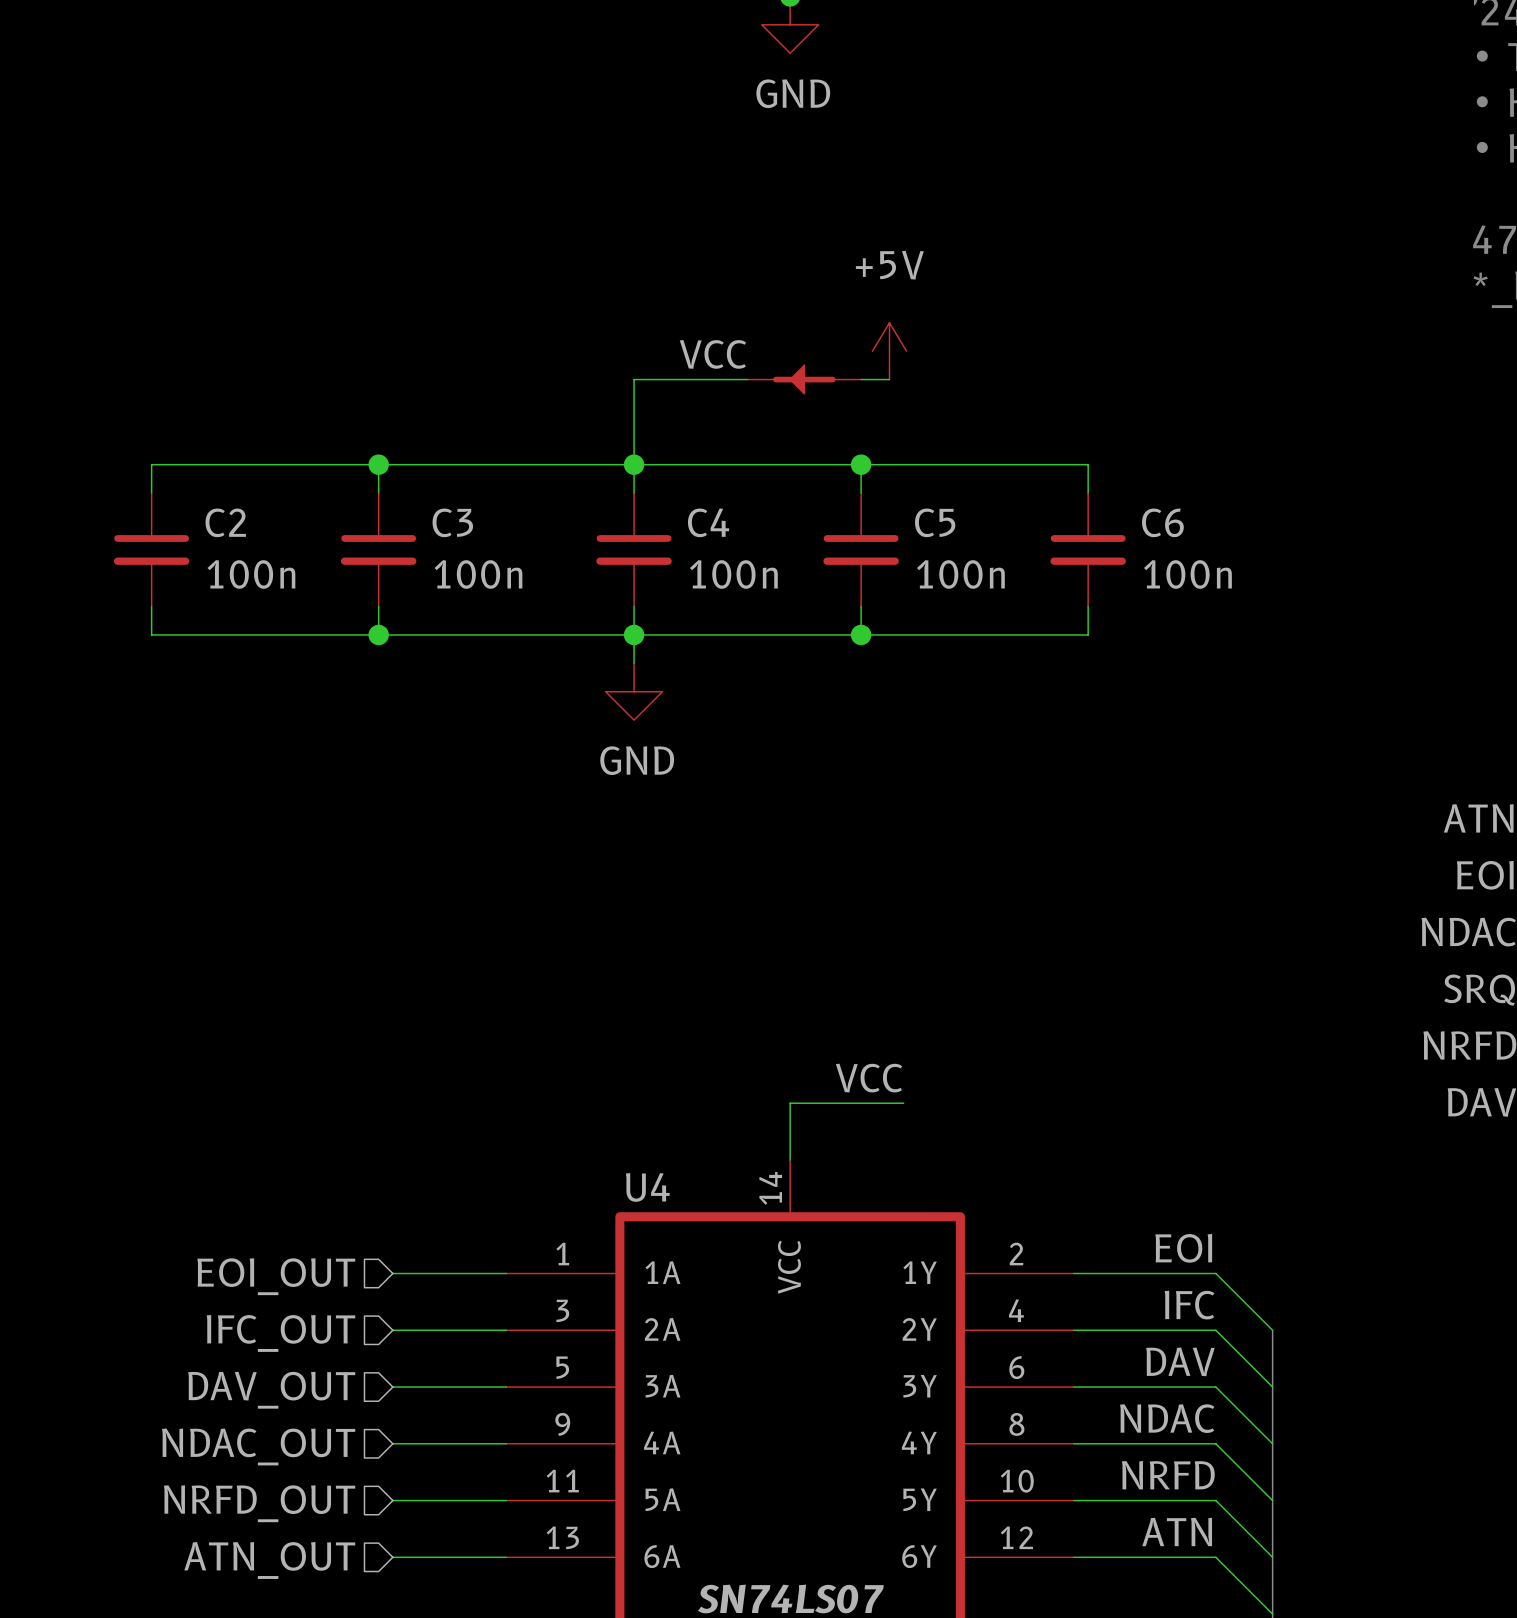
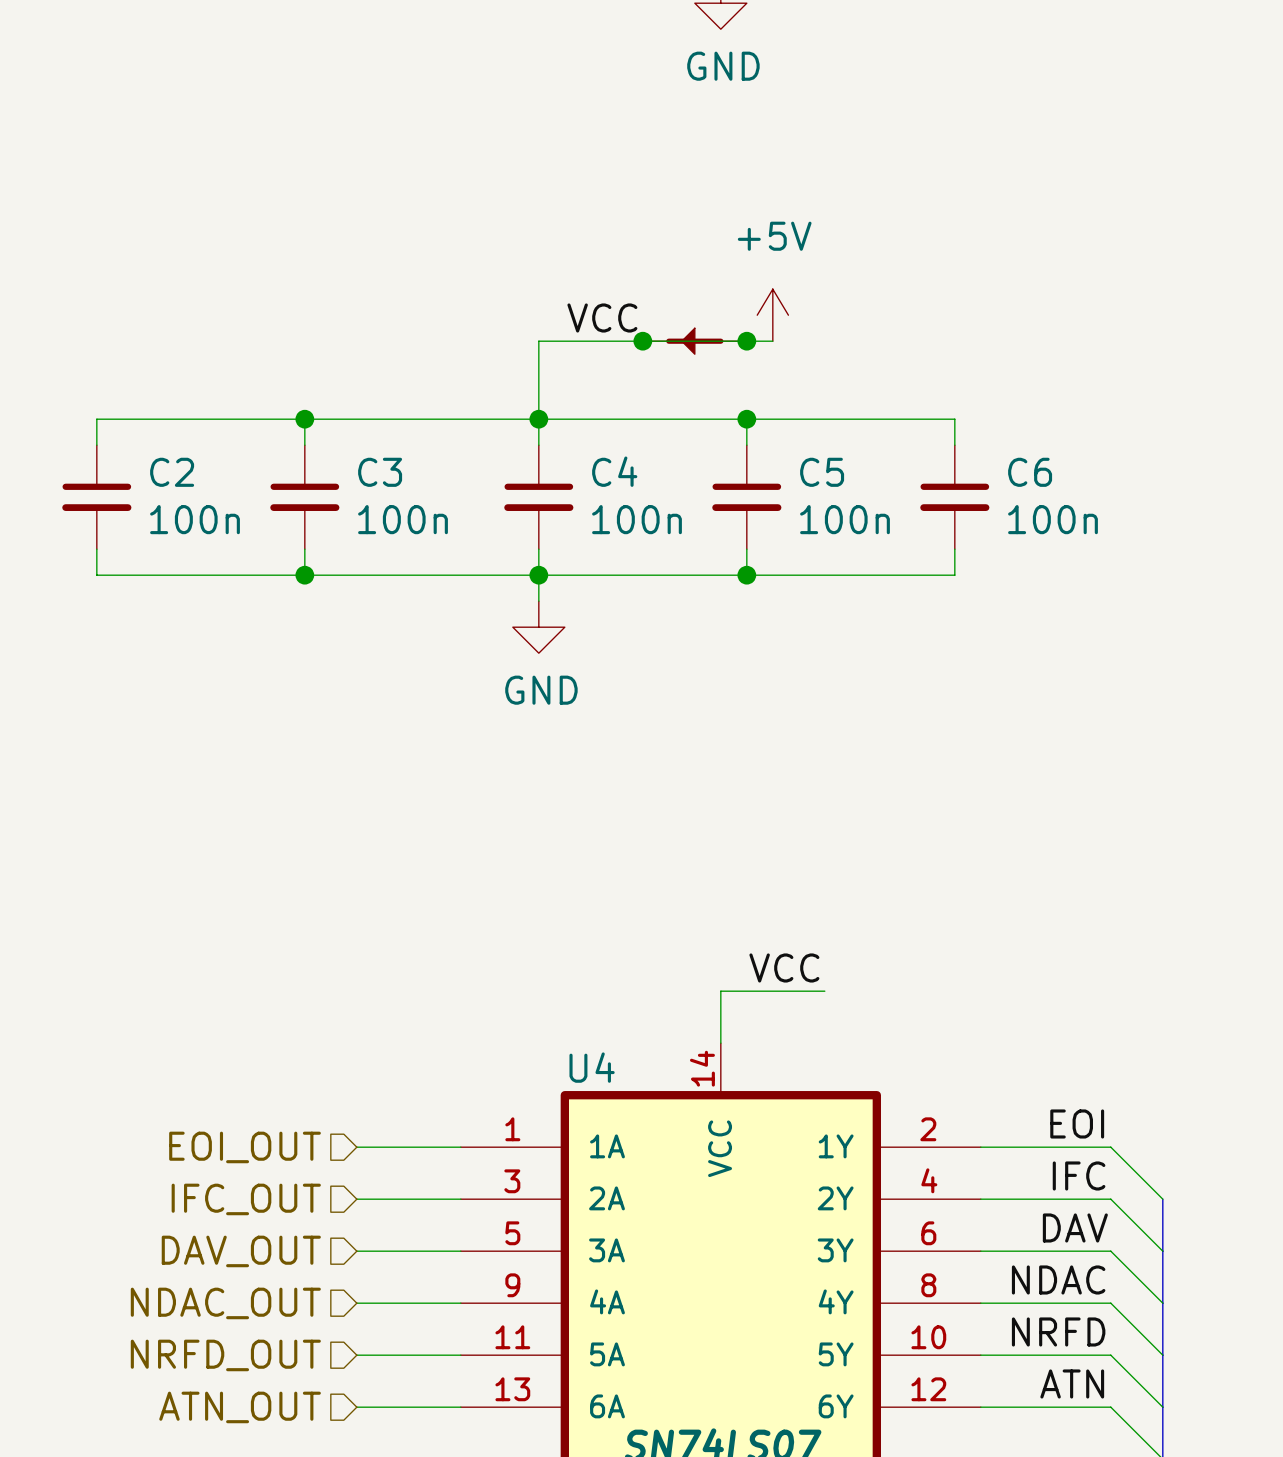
power symbol position: +5V (889, 351) -> +5V (772, 315)
label position: VCC (712, 354) -> VCC (602, 317)
wire: (747, 379) (634, 379) (634, 493) -> none
part position: (804, 379) -> (694, 341)
wire: (861, 379) (889, 379) -> none
junction: none -> (642, 341)
junction: none -> (746, 341)
wire: none -> (772, 341) (538, 341) (538, 445)
wire: (378, 464) (378, 493) -> (304, 419) (304, 445)
junction position: (378, 464) -> (304, 419)
junction position: (634, 464) -> (538, 419)
wire: (861, 464) (861, 493) -> (746, 419) (746, 445)
junction: (861, 464) -> none
junction: none -> (746, 419)
wire: (151, 493) (151, 464) (1088, 464) (1088, 493) -> (96, 445) (96, 419) (954, 419) (954, 445)
C2 position: (151, 549) -> (96, 497)
C3 position: (378, 549) -> (304, 497)
C4 position: (634, 549) -> (538, 497)
C5 position: (861, 549) -> (746, 497)
C6 position: (1088, 549) -> (954, 497)
wire: (151, 606) (151, 634) (1088, 634) (1088, 606) -> (96, 549) (96, 575) (954, 575) (954, 549)
wire: (378, 606) (378, 634) -> (304, 549) (304, 575)
wire: (634, 606) (634, 663) -> (538, 549) (538, 601)
wire: (861, 606) (861, 634) -> (746, 549) (746, 575)
junction position: (378, 634) -> (304, 575)
junction position: (634, 634) -> (538, 575)
junction position: (861, 634) -> (746, 575)
power symbol position: GND (634, 691) -> GND (538, 627)

